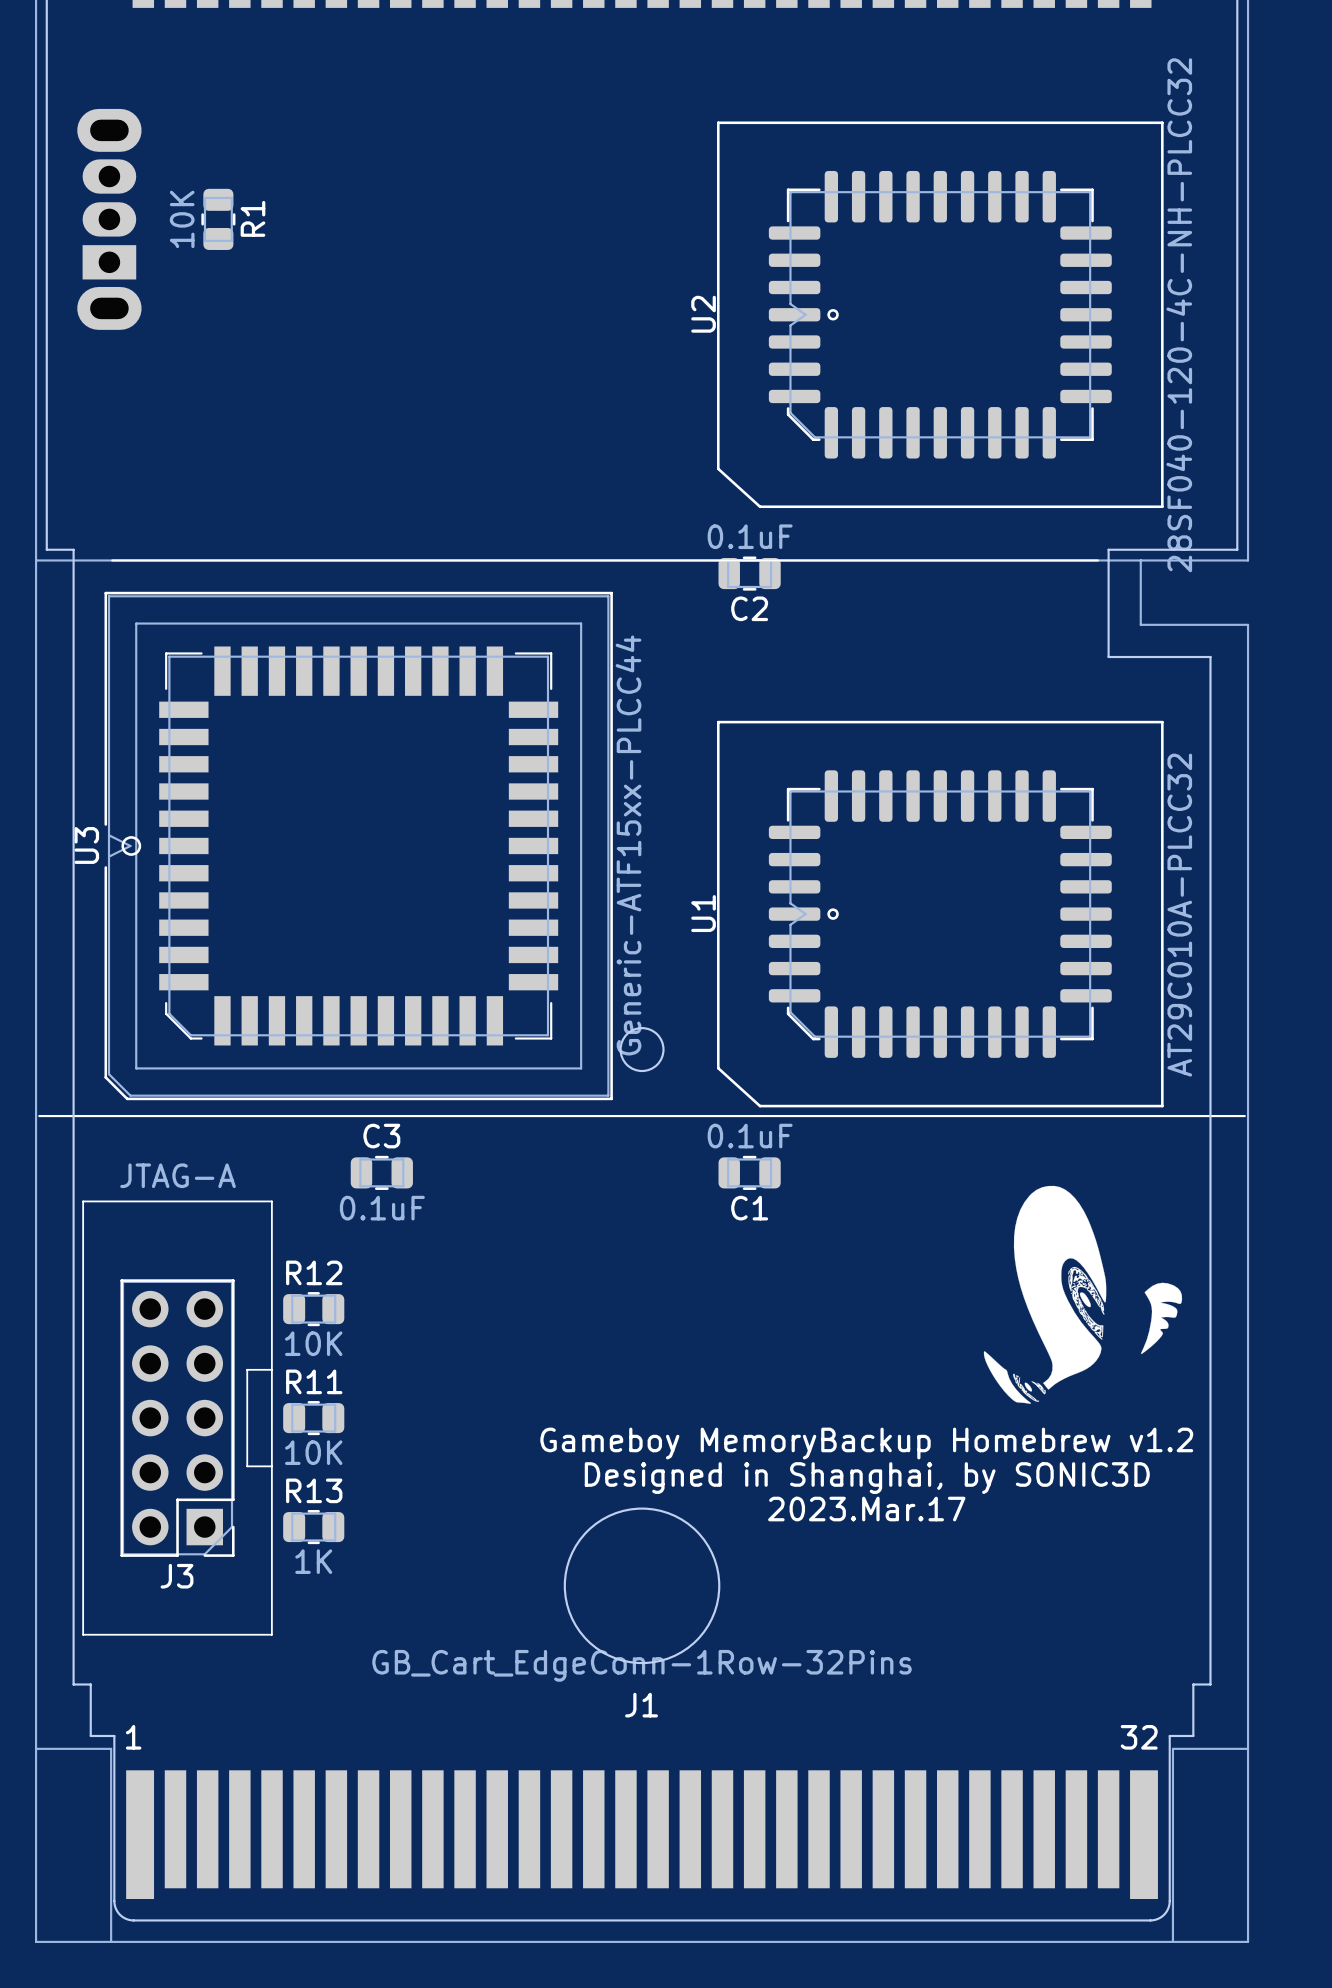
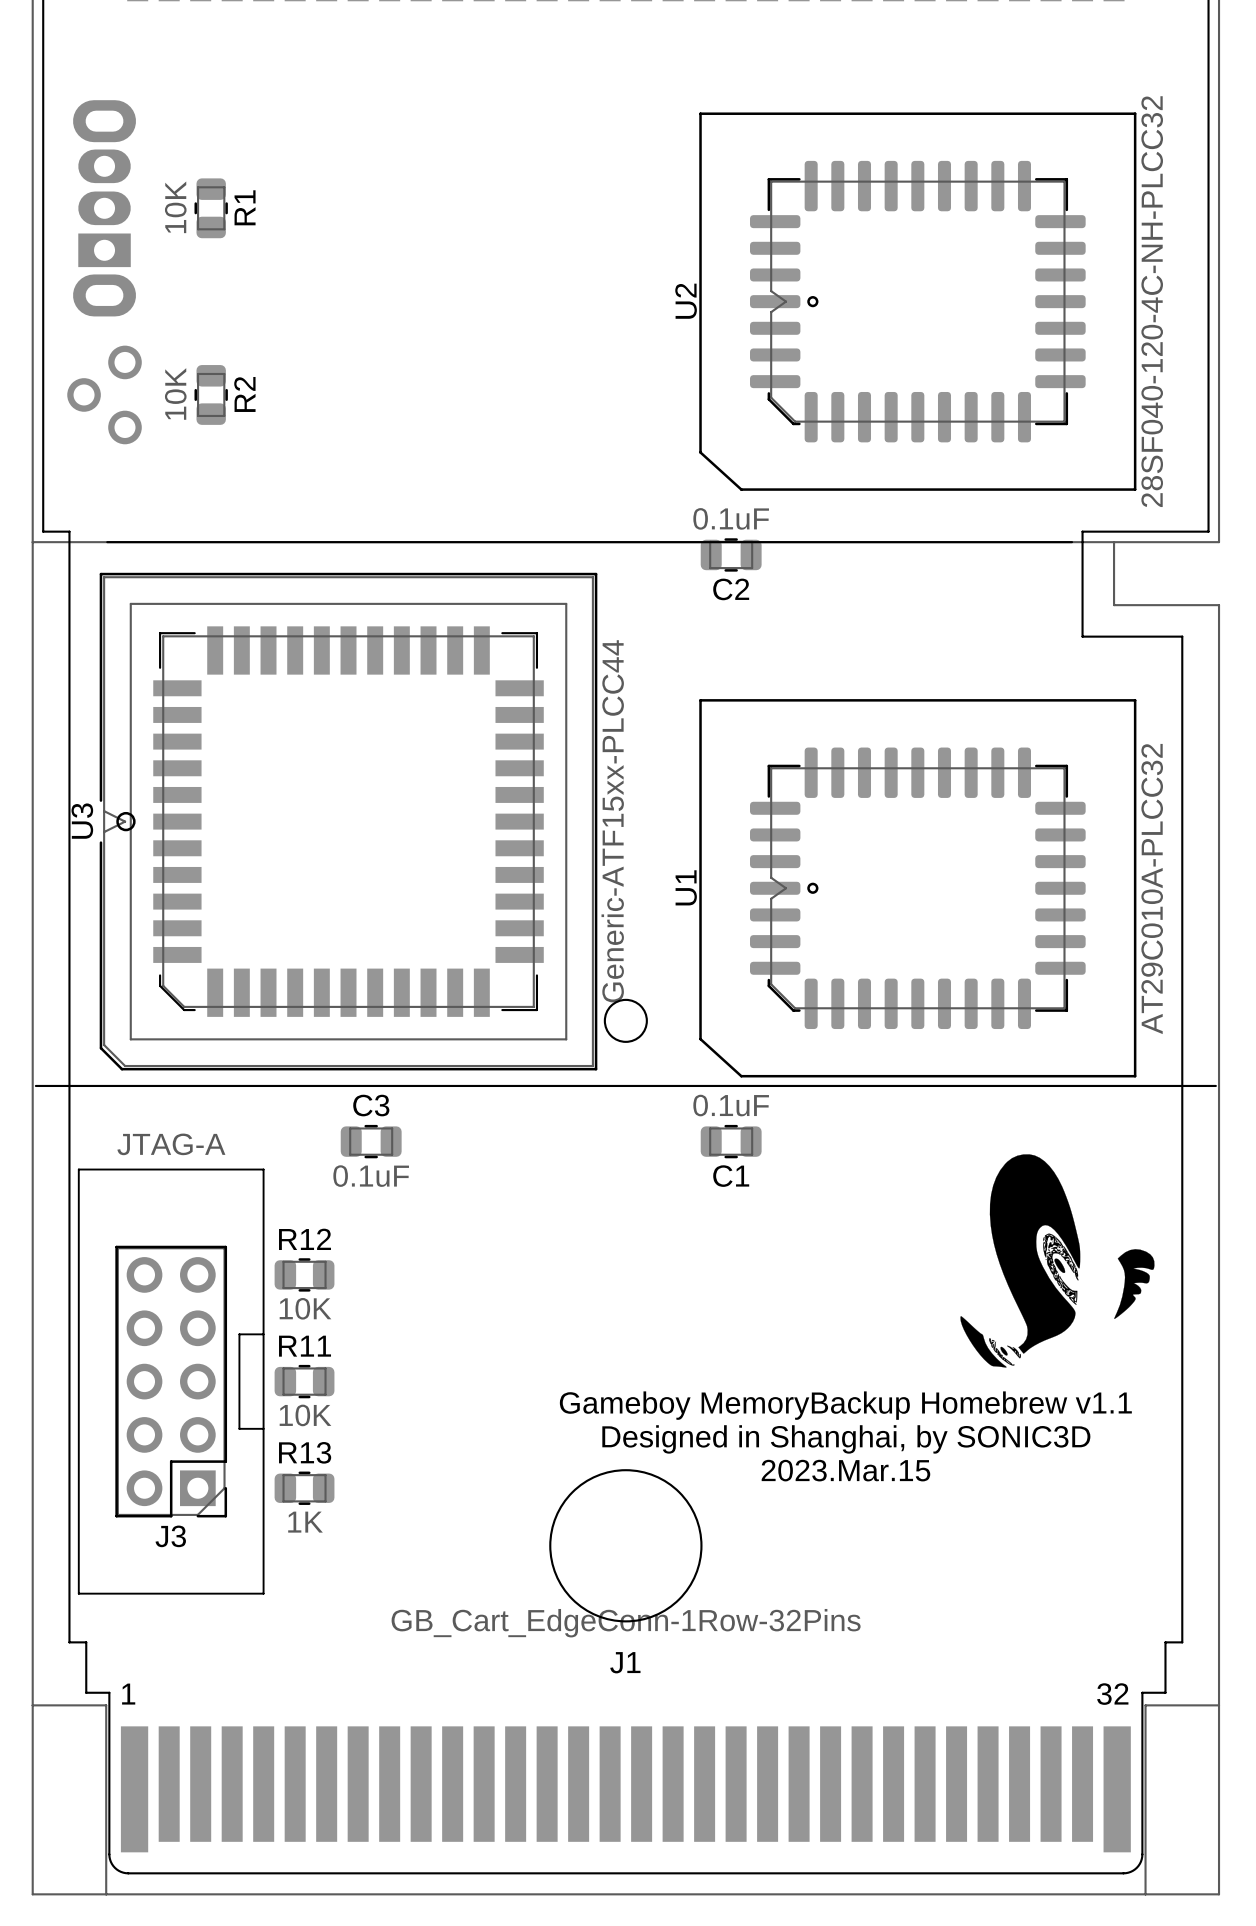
part: none -> (104, 394)
R2: none -> 10K (211, 394)
text: Gameboy MemoryBackup Homebrew v1.2 (866, 1443) -> Gameboy MemoryBackup Homebrew v1.1 (845, 1405)
text: 2023.Mar.17 (866, 1509) -> 2023.Mar.15 (845, 1470)

